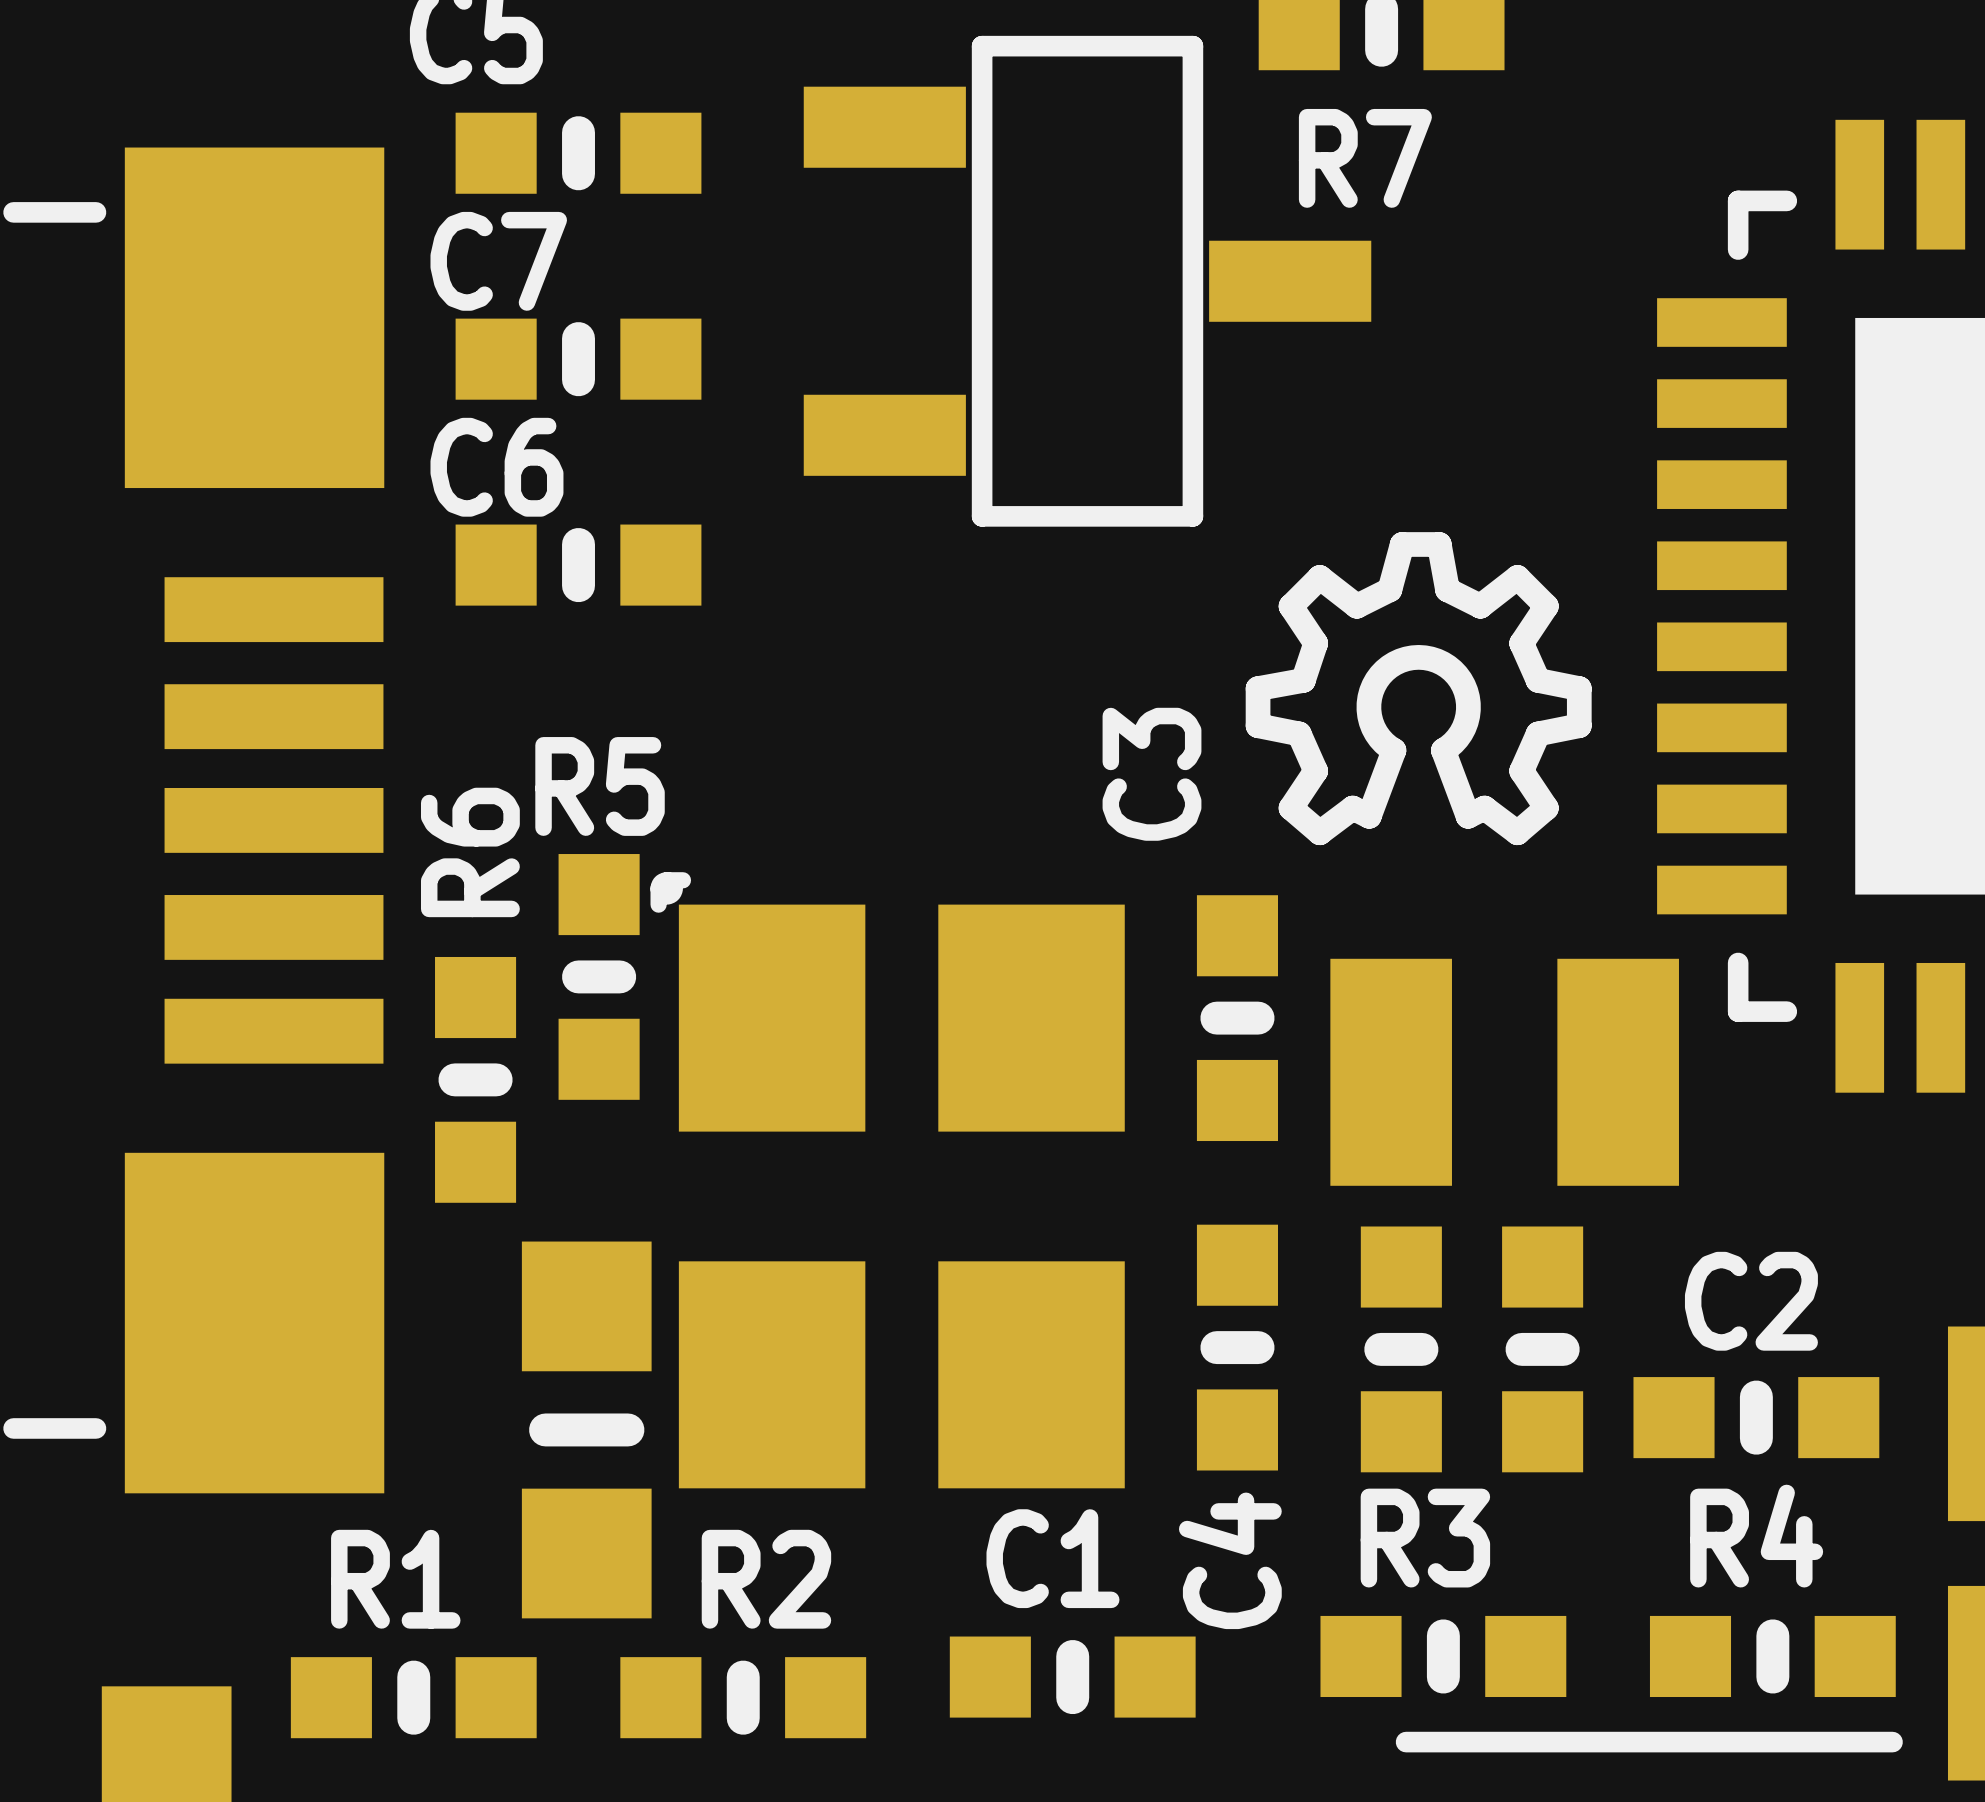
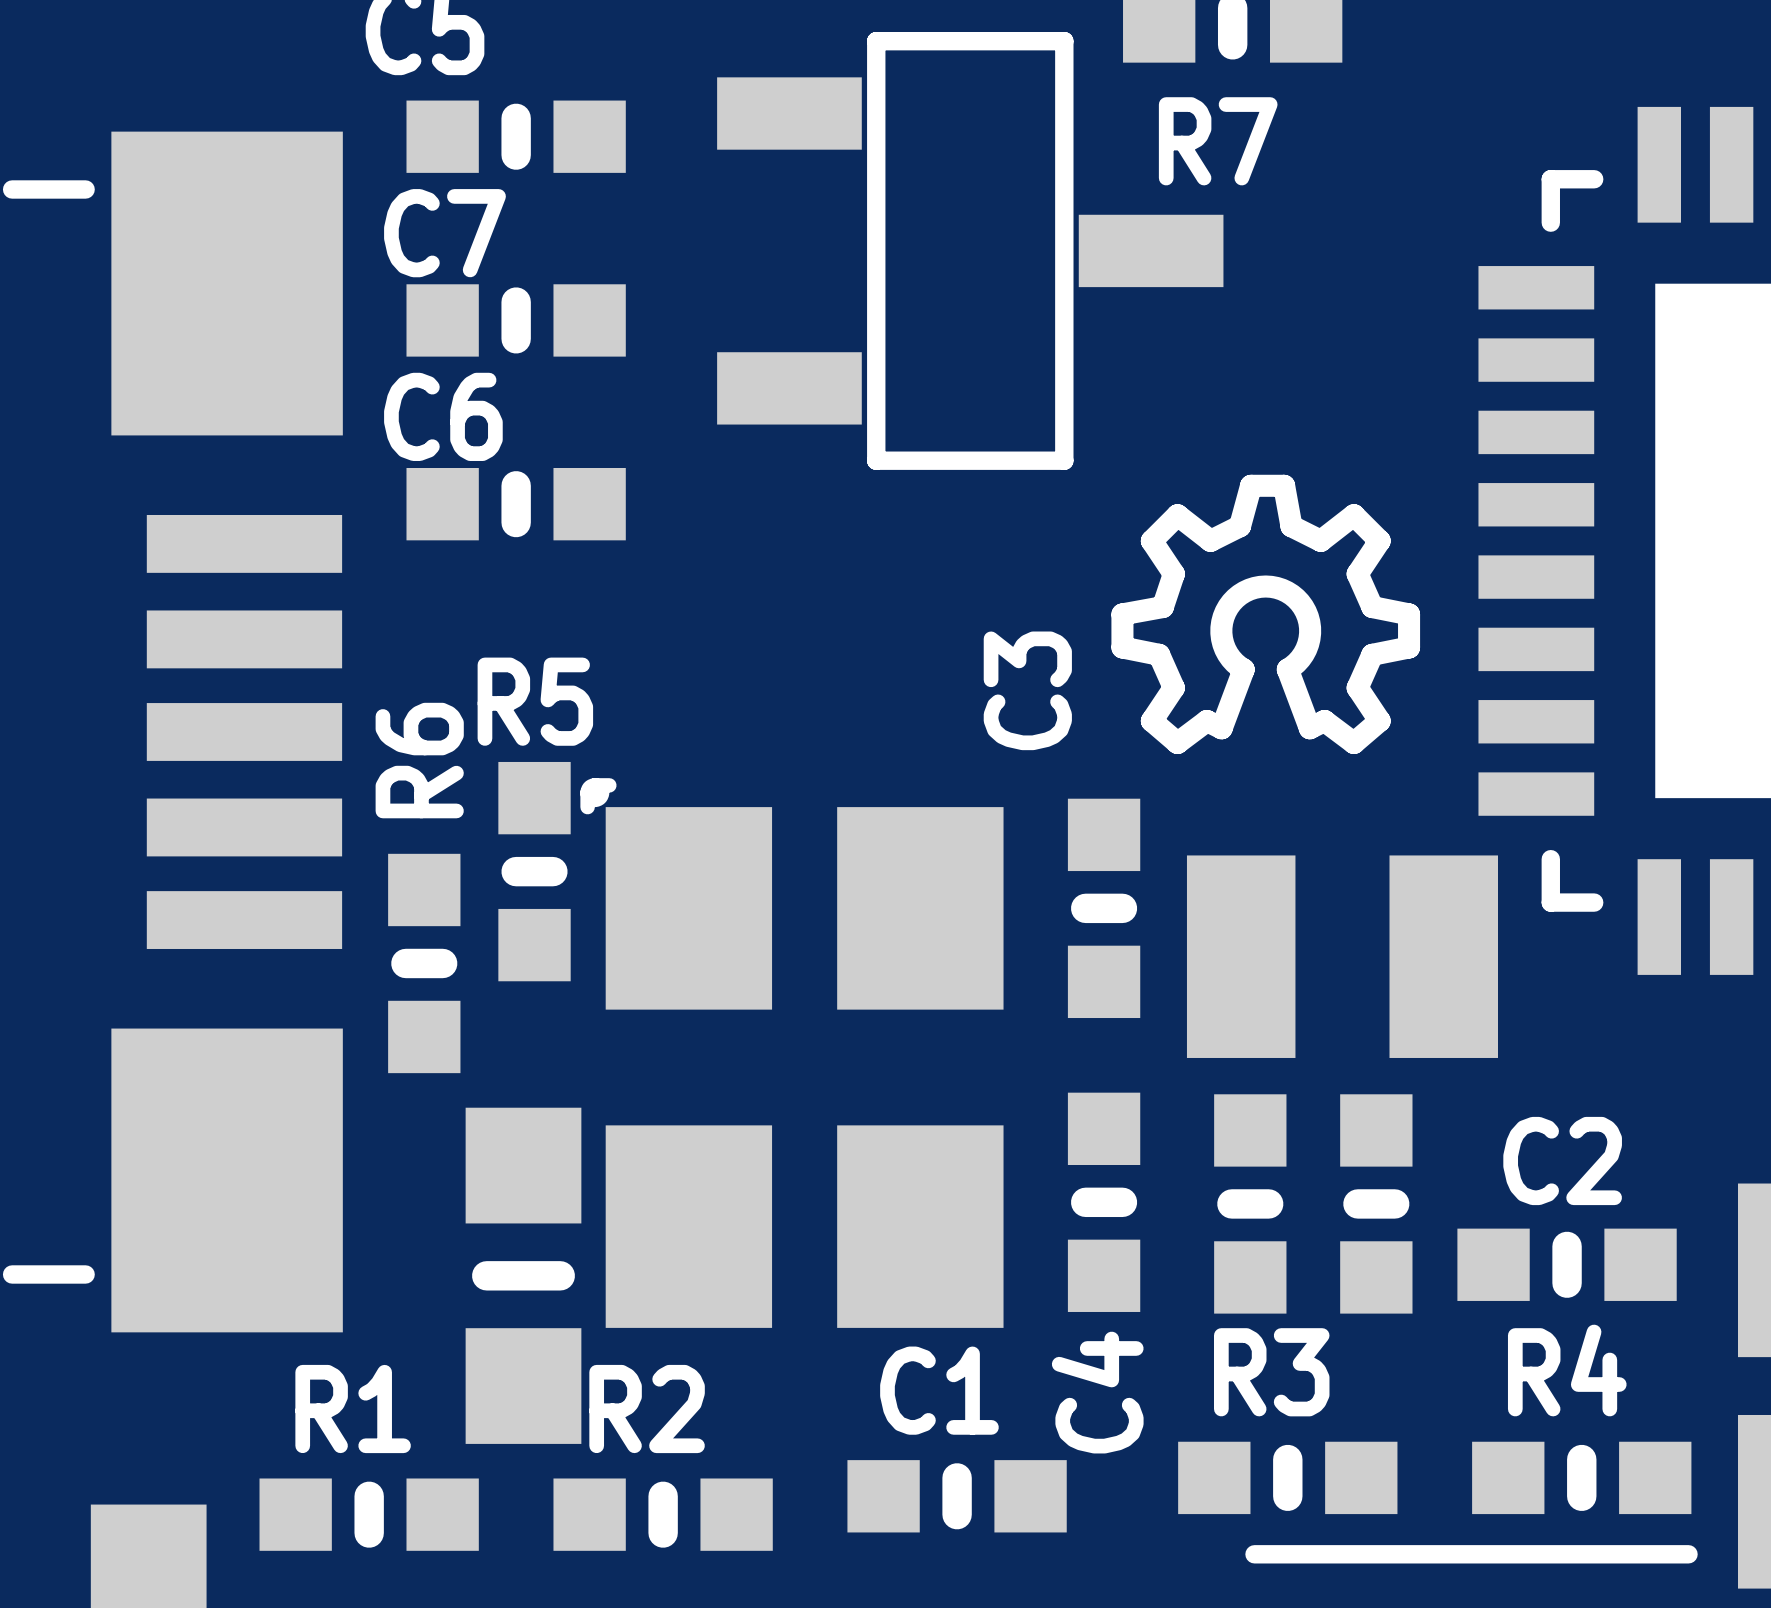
R2 name position: R2 (766, 1579) -> R2 (647, 1409)

